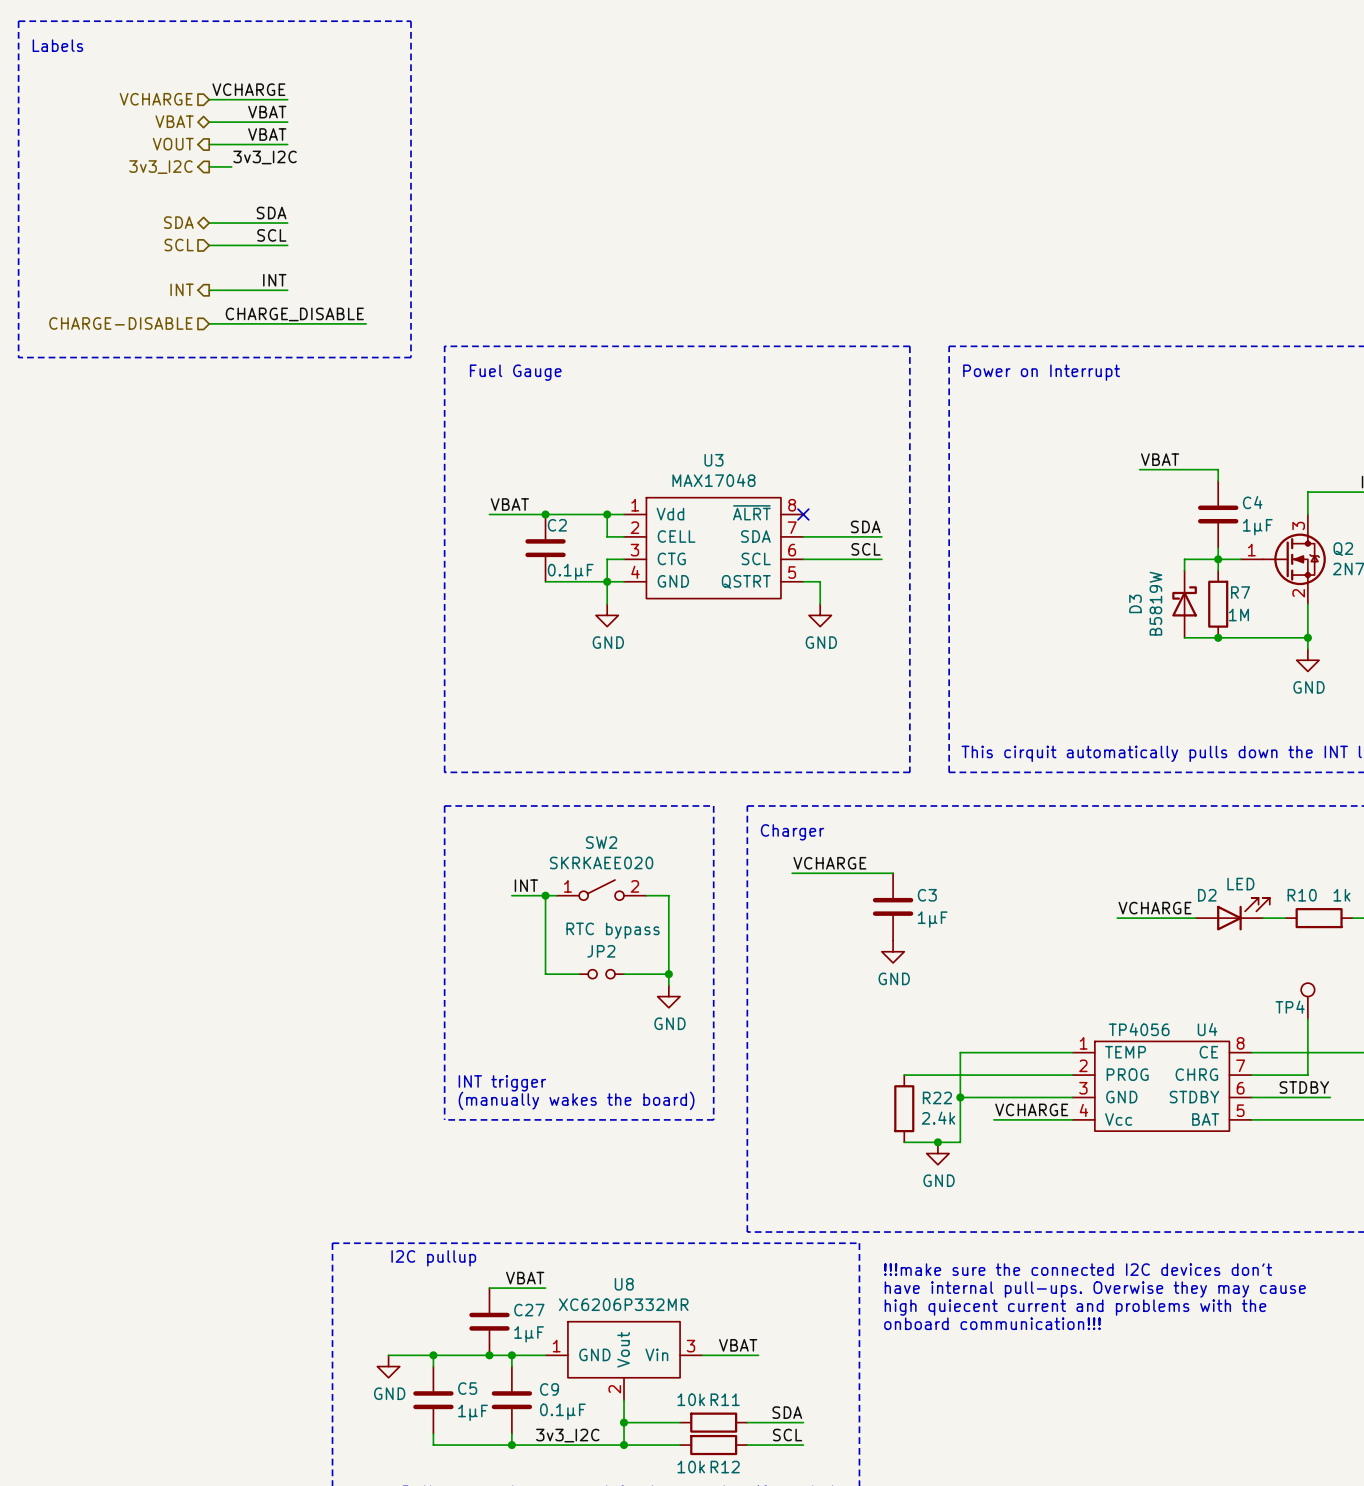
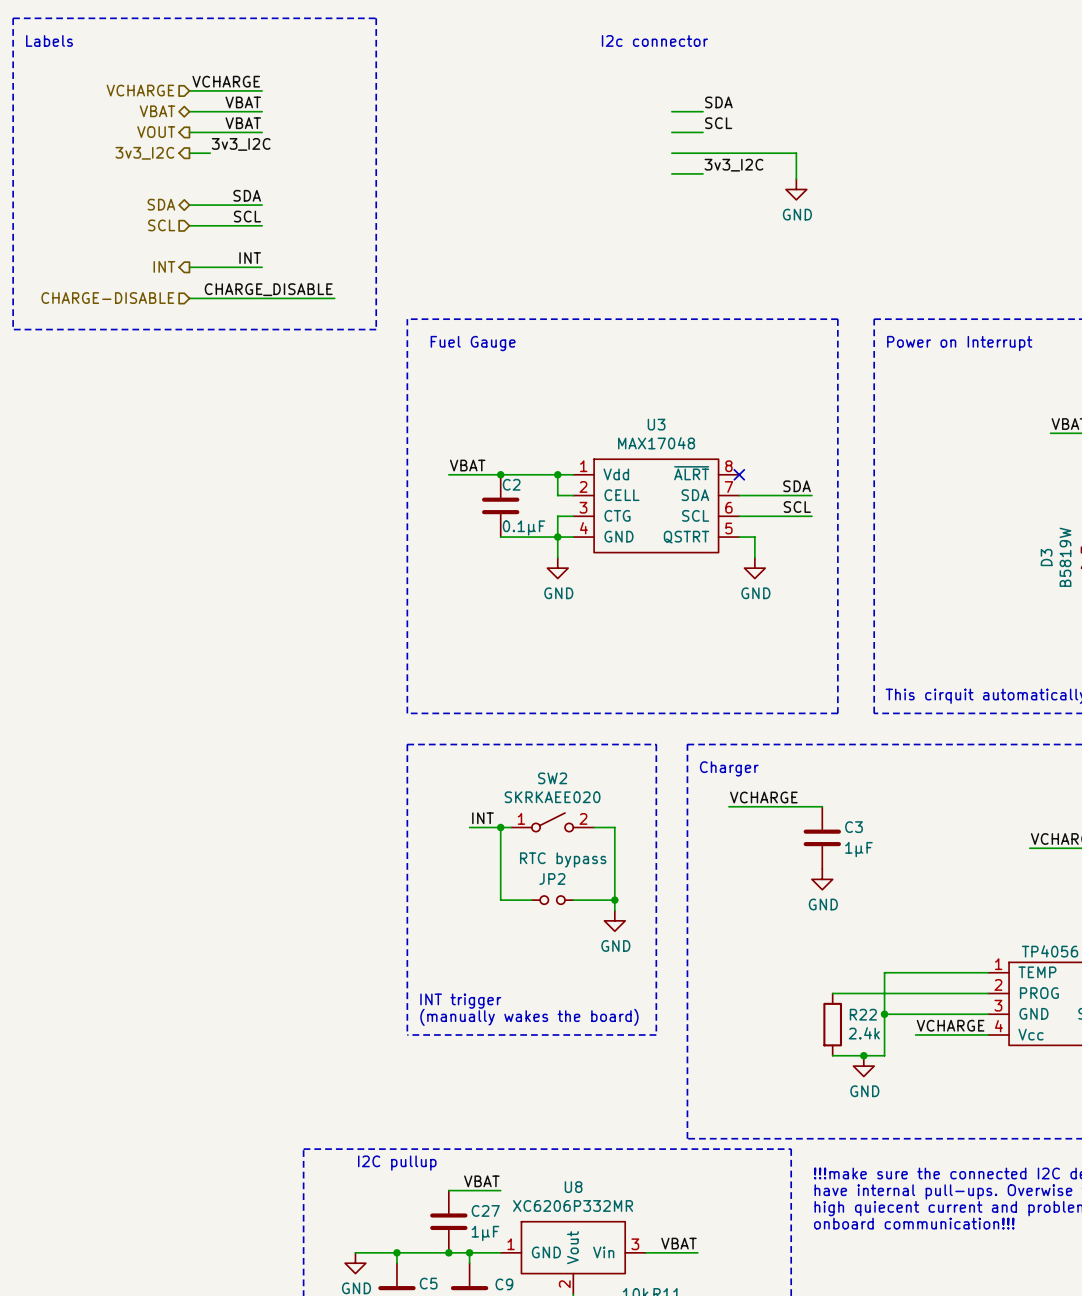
text: none -> I2c connector (654, 40)
label: none -> SDA (718, 102)
wire: none -> (671, 111) (703, 111)
label: none -> SCL (718, 123)
wire: none -> (671, 132) (703, 132)
wire: none -> (671, 153) (796, 153) (796, 179)
label: none -> 3v3_I2C (733, 165)
wire: none -> (671, 173) (703, 173)
power symbol: none -> GND (796, 189)

